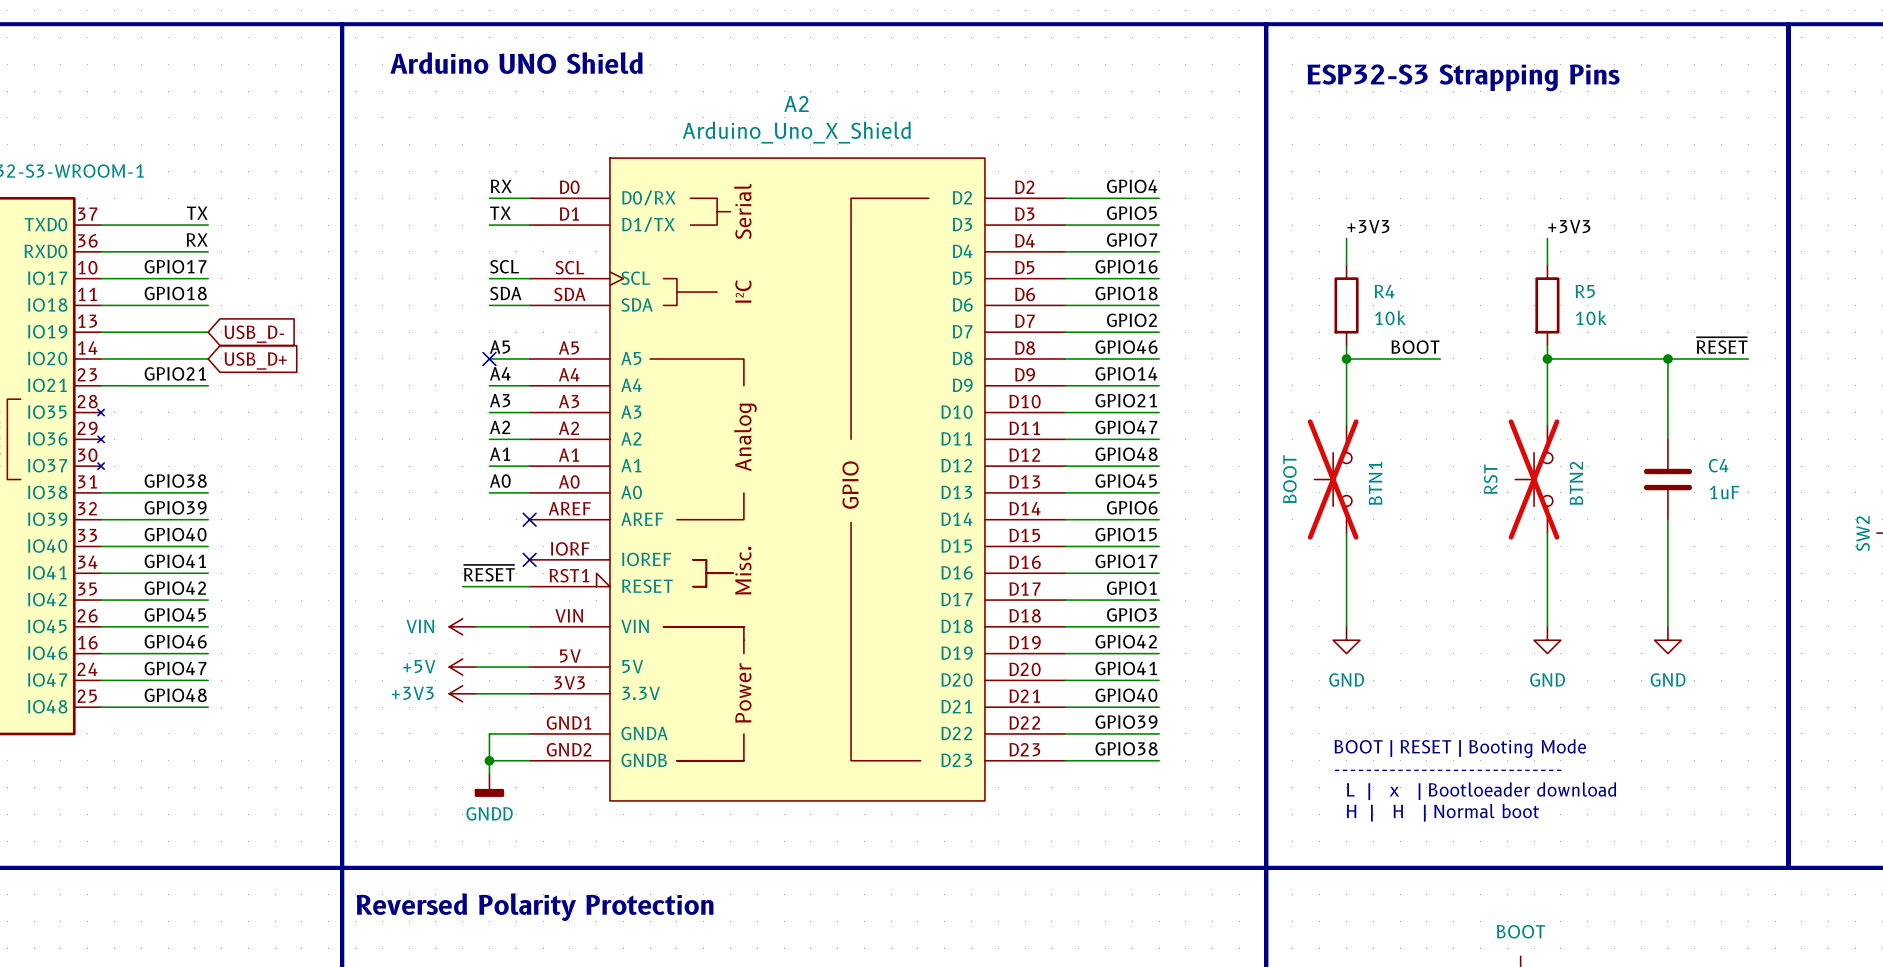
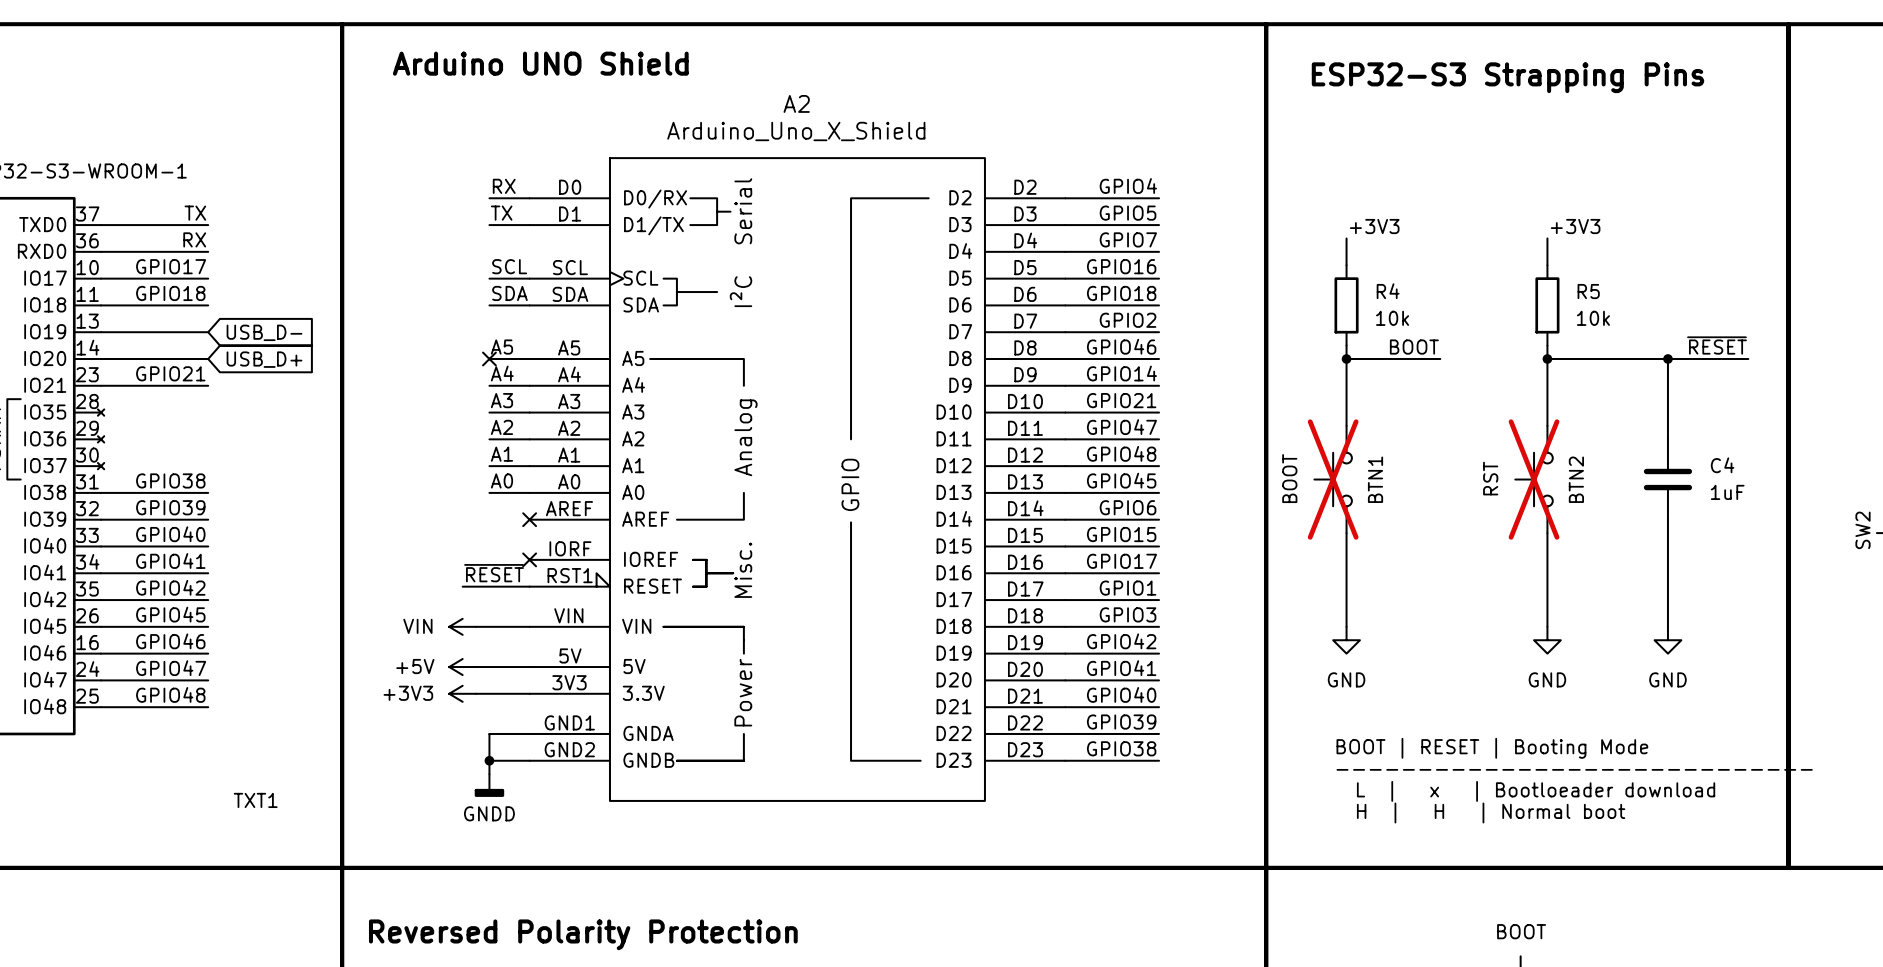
TXT1: none -> (255, 800)
text position: Reversed Polarity Protection (535, 907) -> Reversed Polarity Protection (583, 934)

